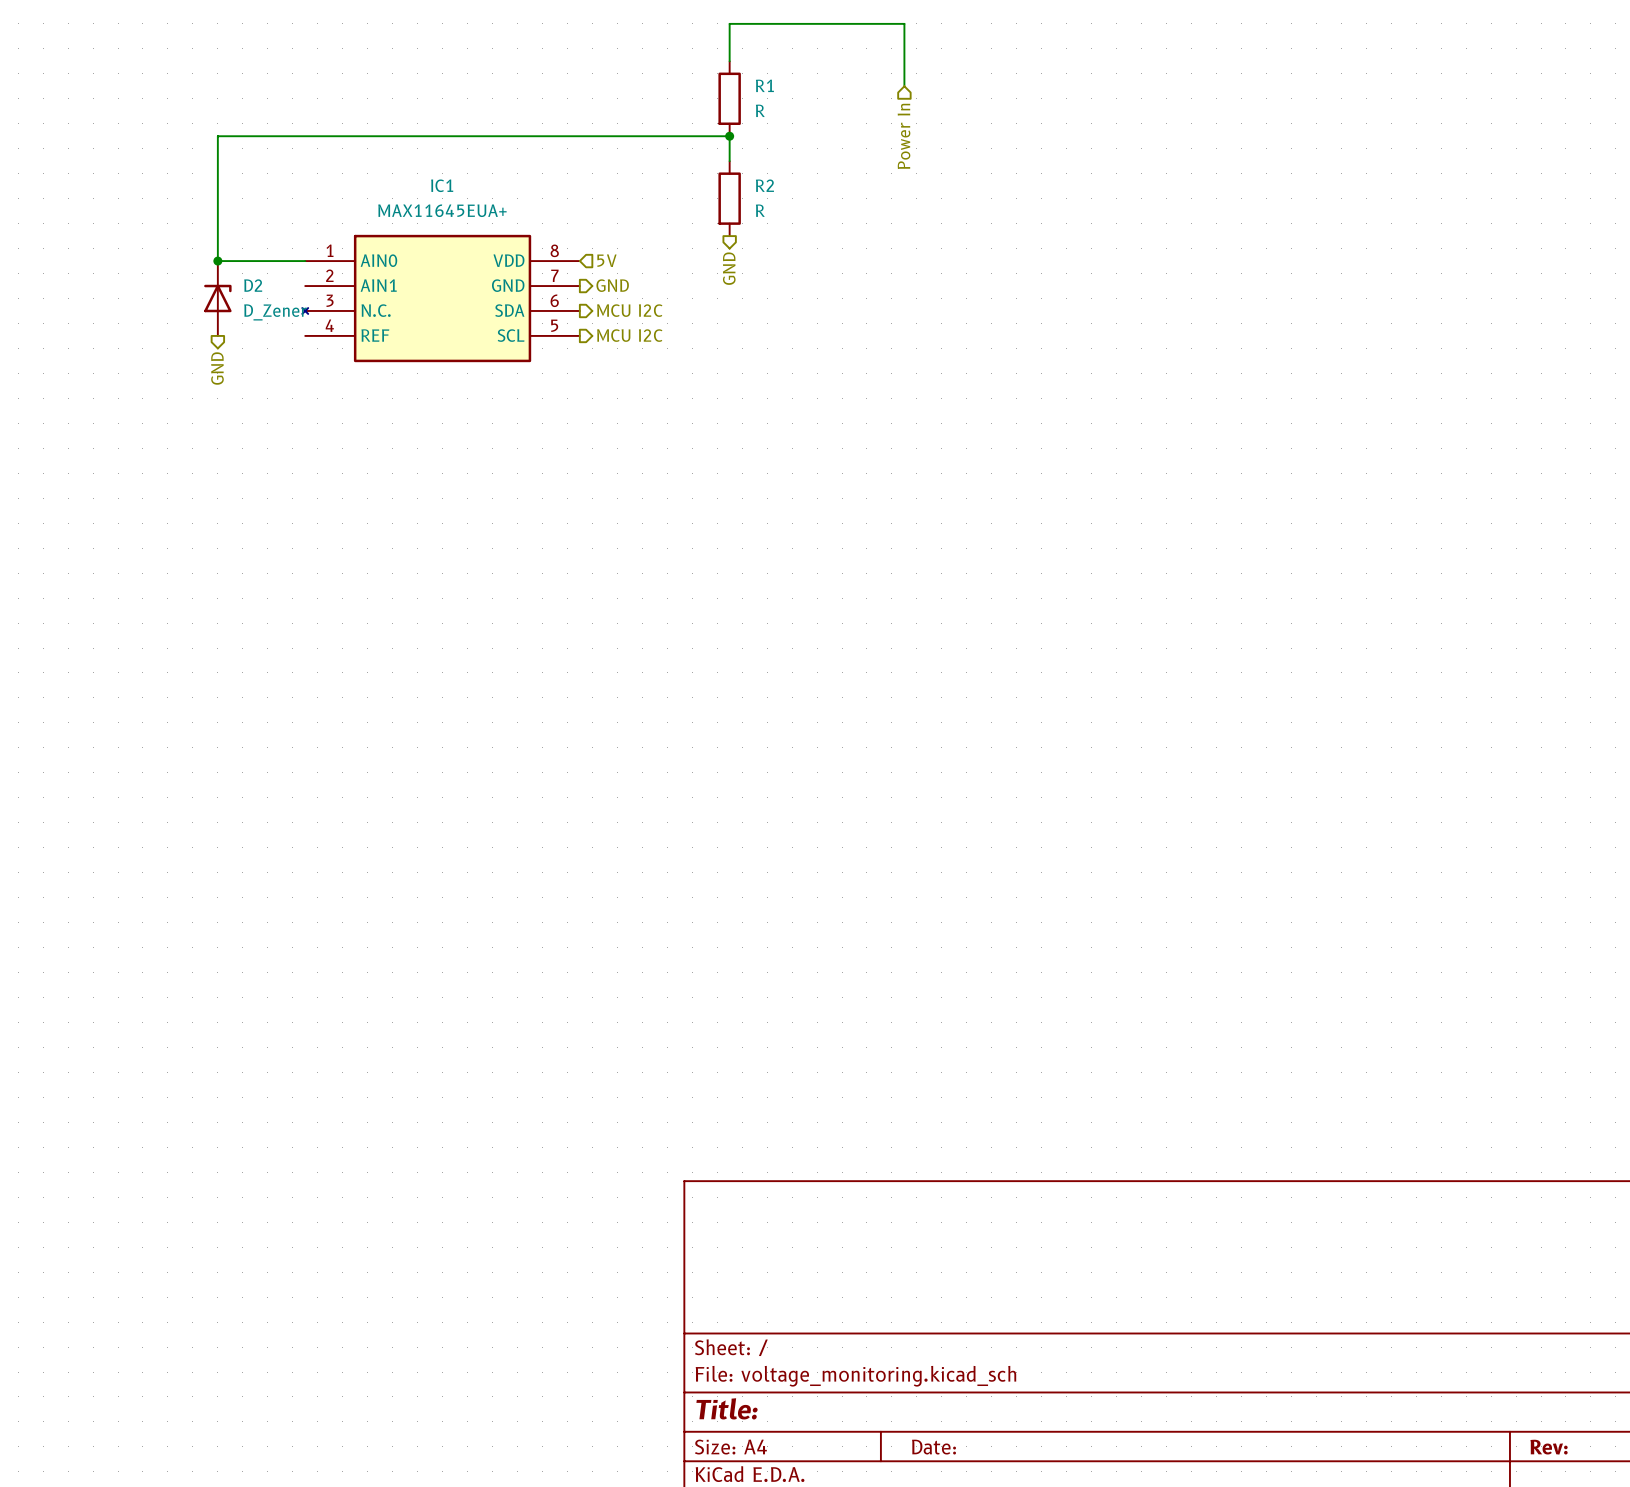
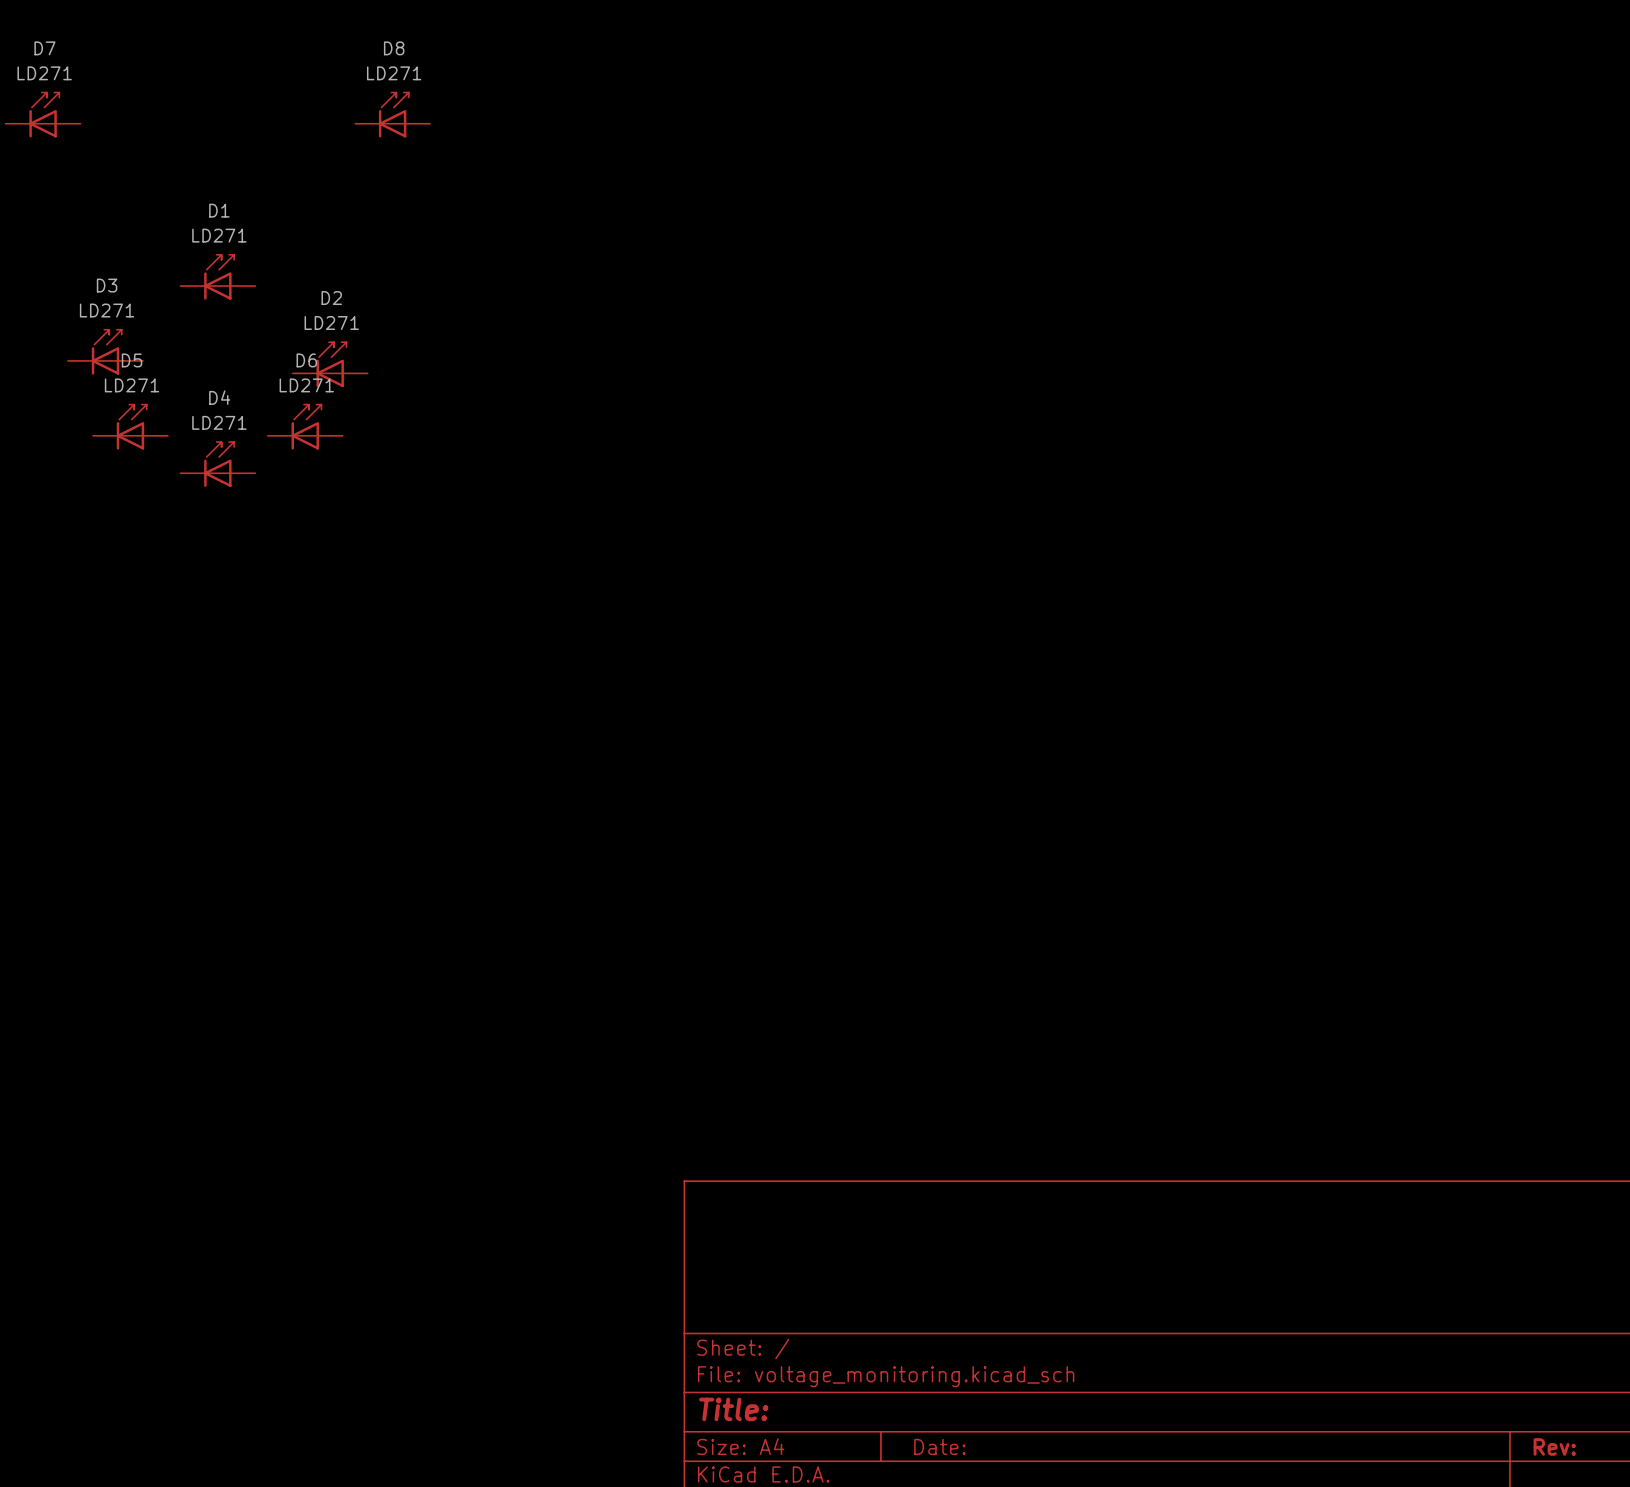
wire: (729, 61) (729, 23) (904, 23) (904, 86) -> none
R1: R (729, 98) -> none
D7: none -> LD271 (43, 115)
D8: none -> LD271 (392, 115)
junction: (729, 136) -> none
hierarchical label: Power In (904, 136) -> none
wire: (729, 161) (729, 136) (217, 136) (217, 261) (305, 261) -> none
R2: R (729, 198) -> none
hierarchical label: 5V (606, 260) -> none
D2 symbol: [204, 261, 232, 336] -> [292, 342, 368, 388]
junction: (217, 261) -> none
hierarchical label: GND (729, 268) -> none
D1: none -> LD271 (217, 277)
D2 name position: D2 (253, 285) -> D2 (331, 298)
hierarchical label: GND (612, 285) -> none
IC1: MAX11645EUA+ (441, 298) -> none
hierarchical label: MCU I2C (629, 310) -> none
D2 value: D_Zener (275, 312) -> LD271 (331, 323)
hierarchical label: MCU I2C (629, 335) -> none
D3: none -> LD271 (105, 352)
hierarchical label: GND (217, 368) -> none
D5: none -> LD271 (130, 427)
D6: none -> LD271 (305, 427)
D4: none -> LD271 (217, 464)

